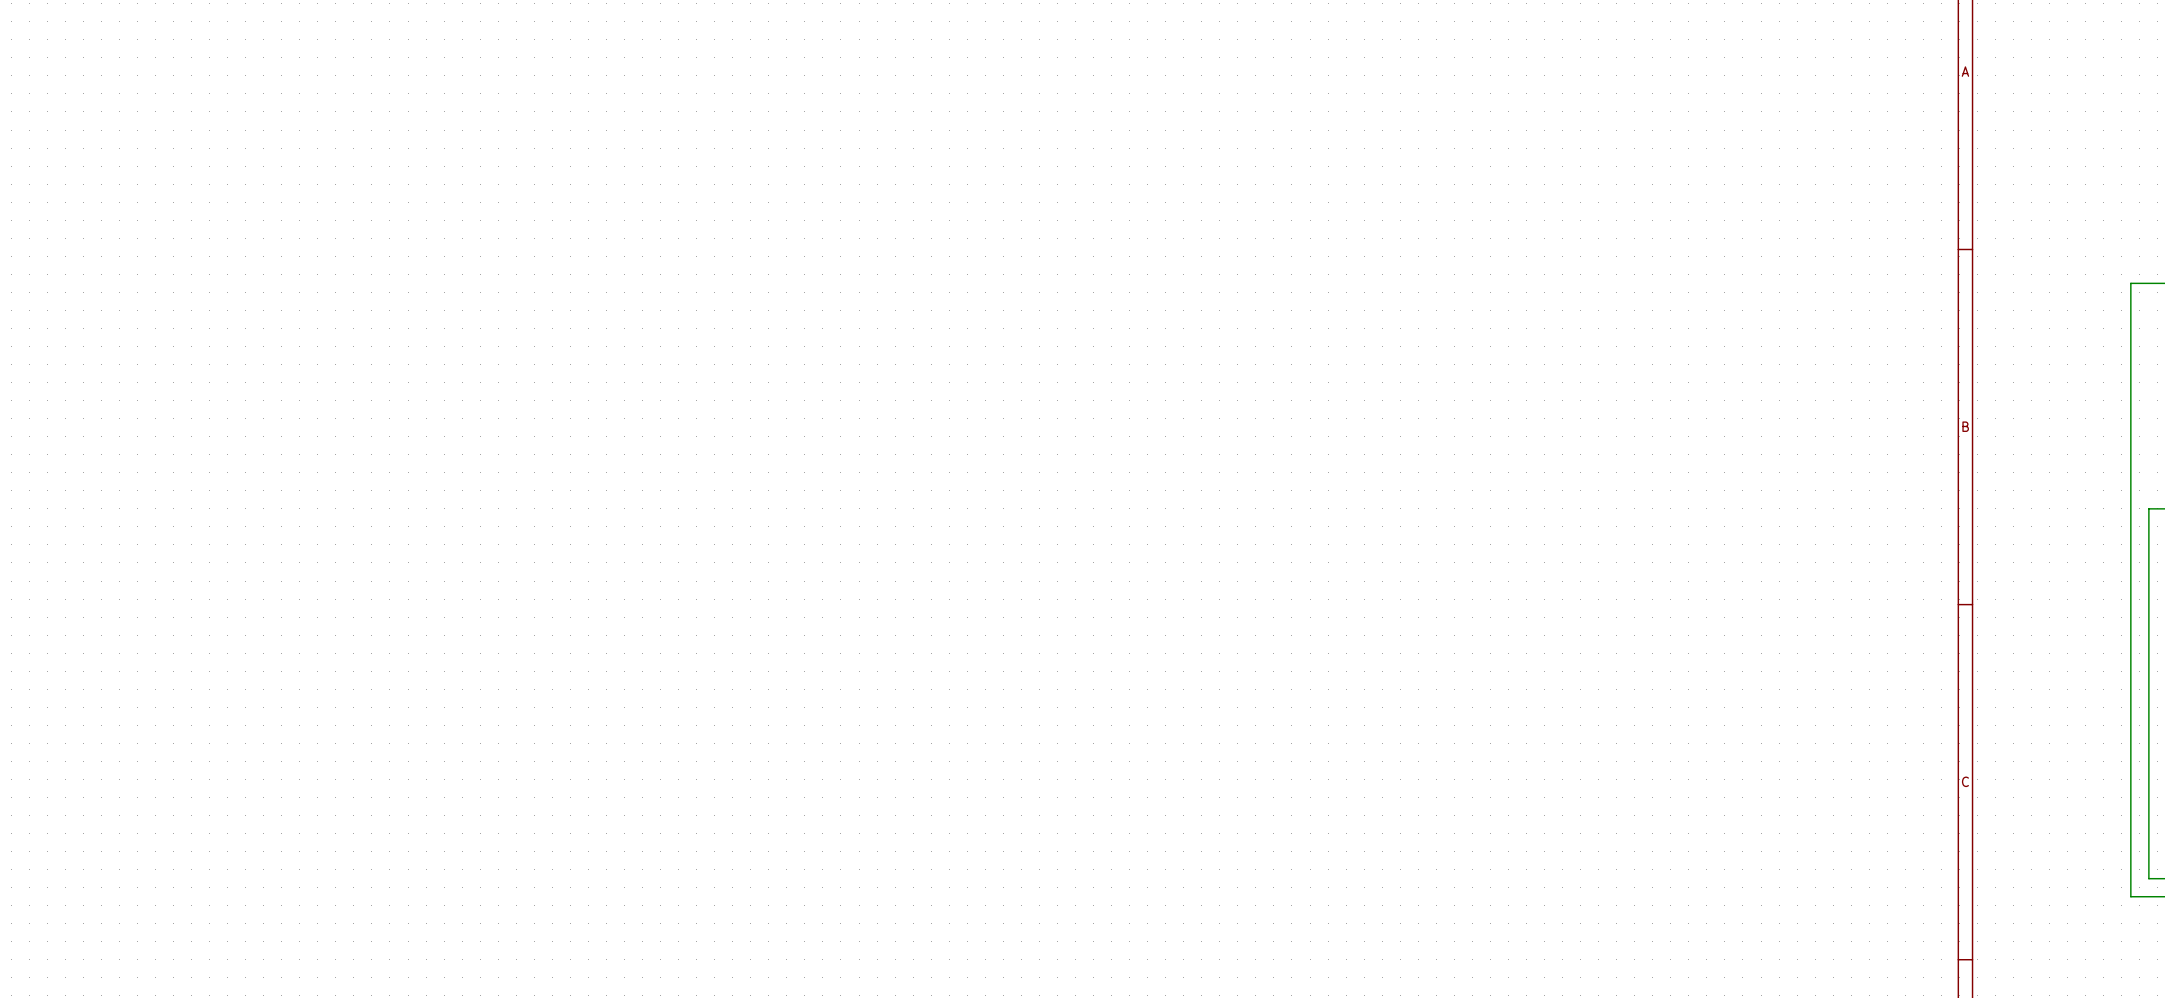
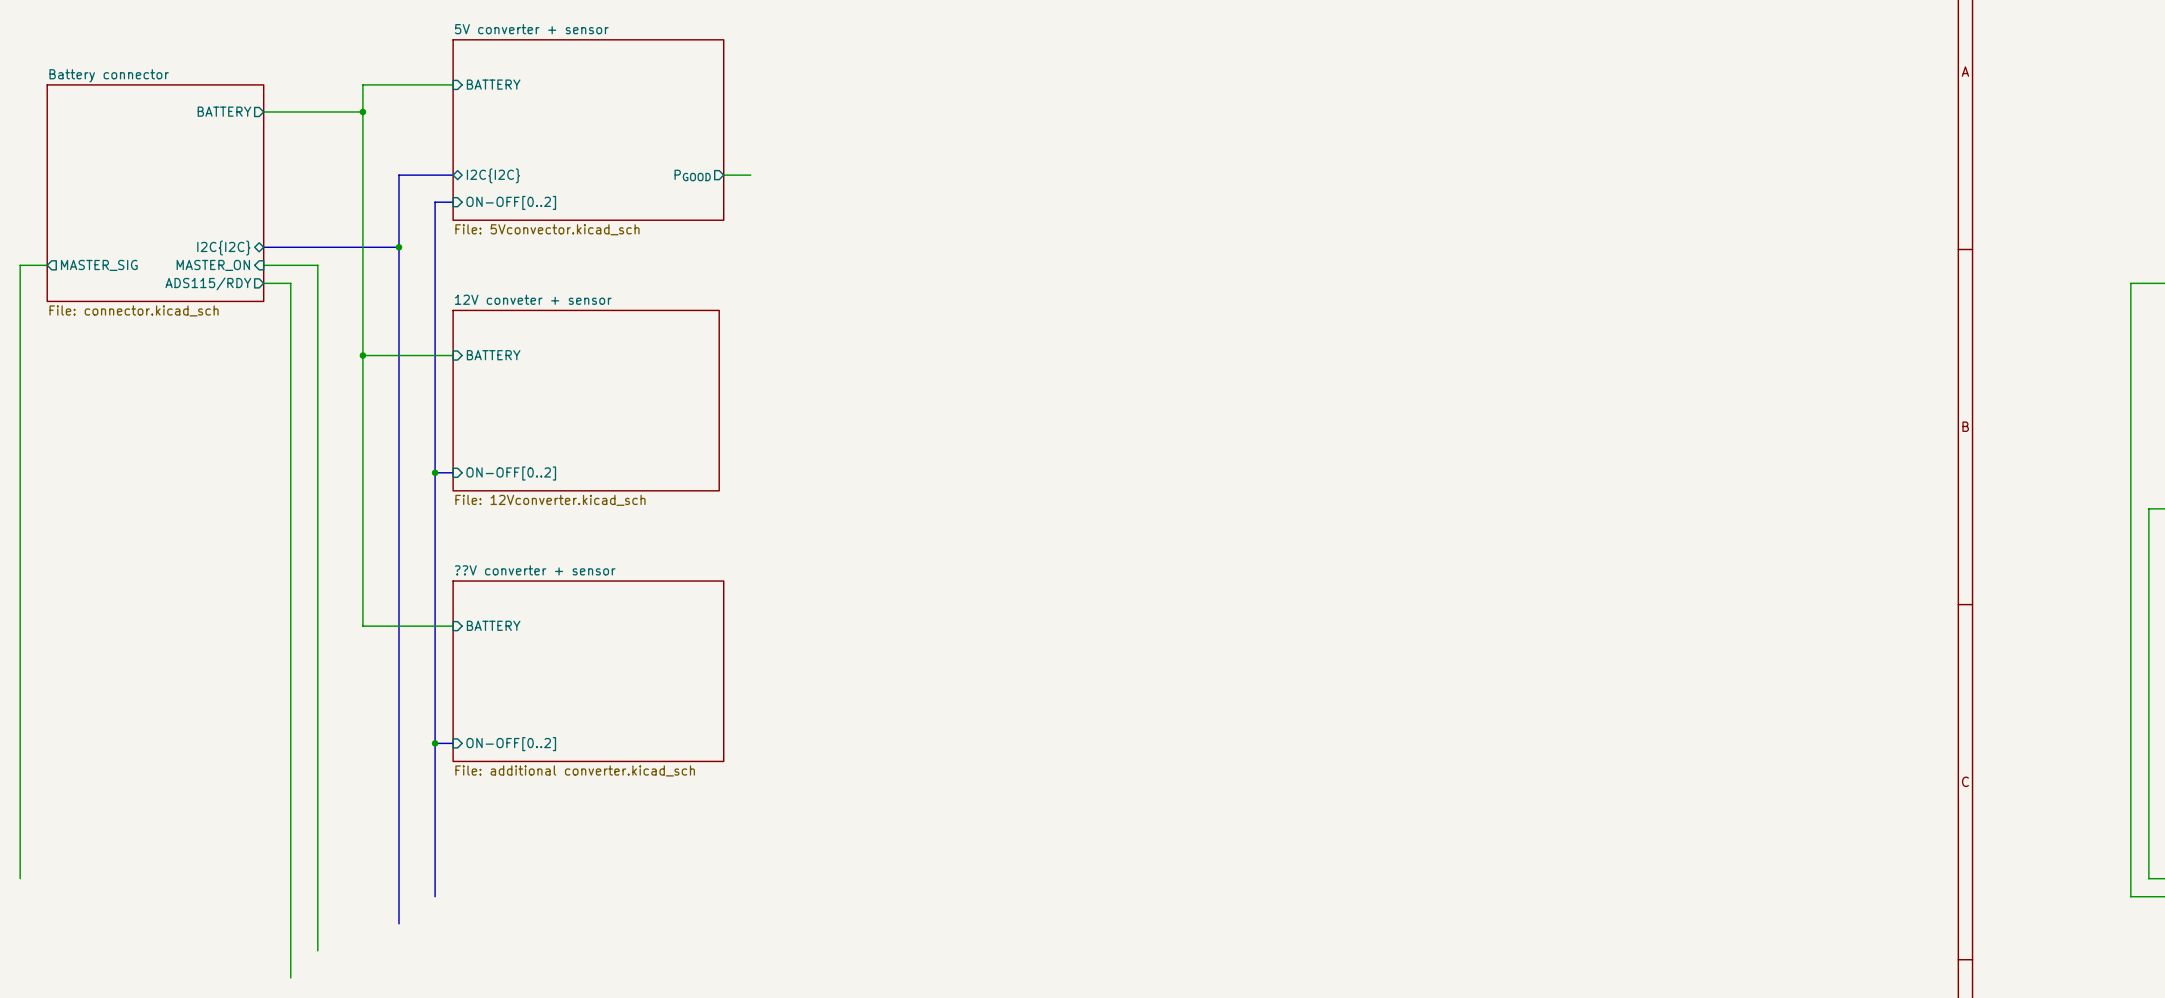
wire: none -> (453, 84) (362, 84) (362, 626) (453, 626)
sheet pin: none -> BATTERY (493, 84)
sheet pin: none -> BATTERY (224, 111)
wire: none -> (263, 111) (362, 111)
junction: none -> (362, 111)
sheet 5V converter + sensor: none -> File: 5Vconvector.kicad_sch (588, 130)
bus: none -> (453, 175) (399, 175) (399, 923)
sheet pin: none -> I2C{I2C} (493, 175)
sheet pin: none -> PGOOD (692, 175)
wire: none -> (723, 175) (750, 175)
sheet Battery connector: none -> File: connector.kicad_sch (155, 193)
bus: none -> (453, 202) (435, 202) (435, 896)
sheet pin: none -> ON-OFF[0..2] (511, 202)
bus: none -> (263, 247) (399, 247)
junction: none -> (399, 247)
sheet pin: none -> I2C{I2C} (223, 248)
wire: none -> (47, 265) (20, 265) (20, 878)
sheet pin: none -> MASTER_SIG (99, 265)
sheet pin: none -> MASTER_ON (213, 265)
wire: none -> (263, 265) (317, 265) (317, 950)
sheet pin: none -> ADS115/RDY (208, 283)
wire: none -> (263, 283) (290, 283) (290, 977)
wire: none -> (362, 355) (453, 355)
junction: none -> (362, 355)
sheet pin: none -> BATTERY (493, 355)
sheet 12V conveter + sensor: none -> File: 12Vconverter.kicad_sch (586, 400)
bus: none -> (435, 472) (453, 472)
junction: none -> (435, 472)
sheet pin: none -> ON-OFF[0..2] (511, 473)
sheet pin: none -> BATTERY (493, 625)
sheet ??V converter + sensor: none -> File: additional converter.kicad_sch (588, 671)
bus: none -> (435, 743) (453, 743)
junction: none -> (435, 743)
sheet pin: none -> ON-OFF[0..2] (511, 744)

